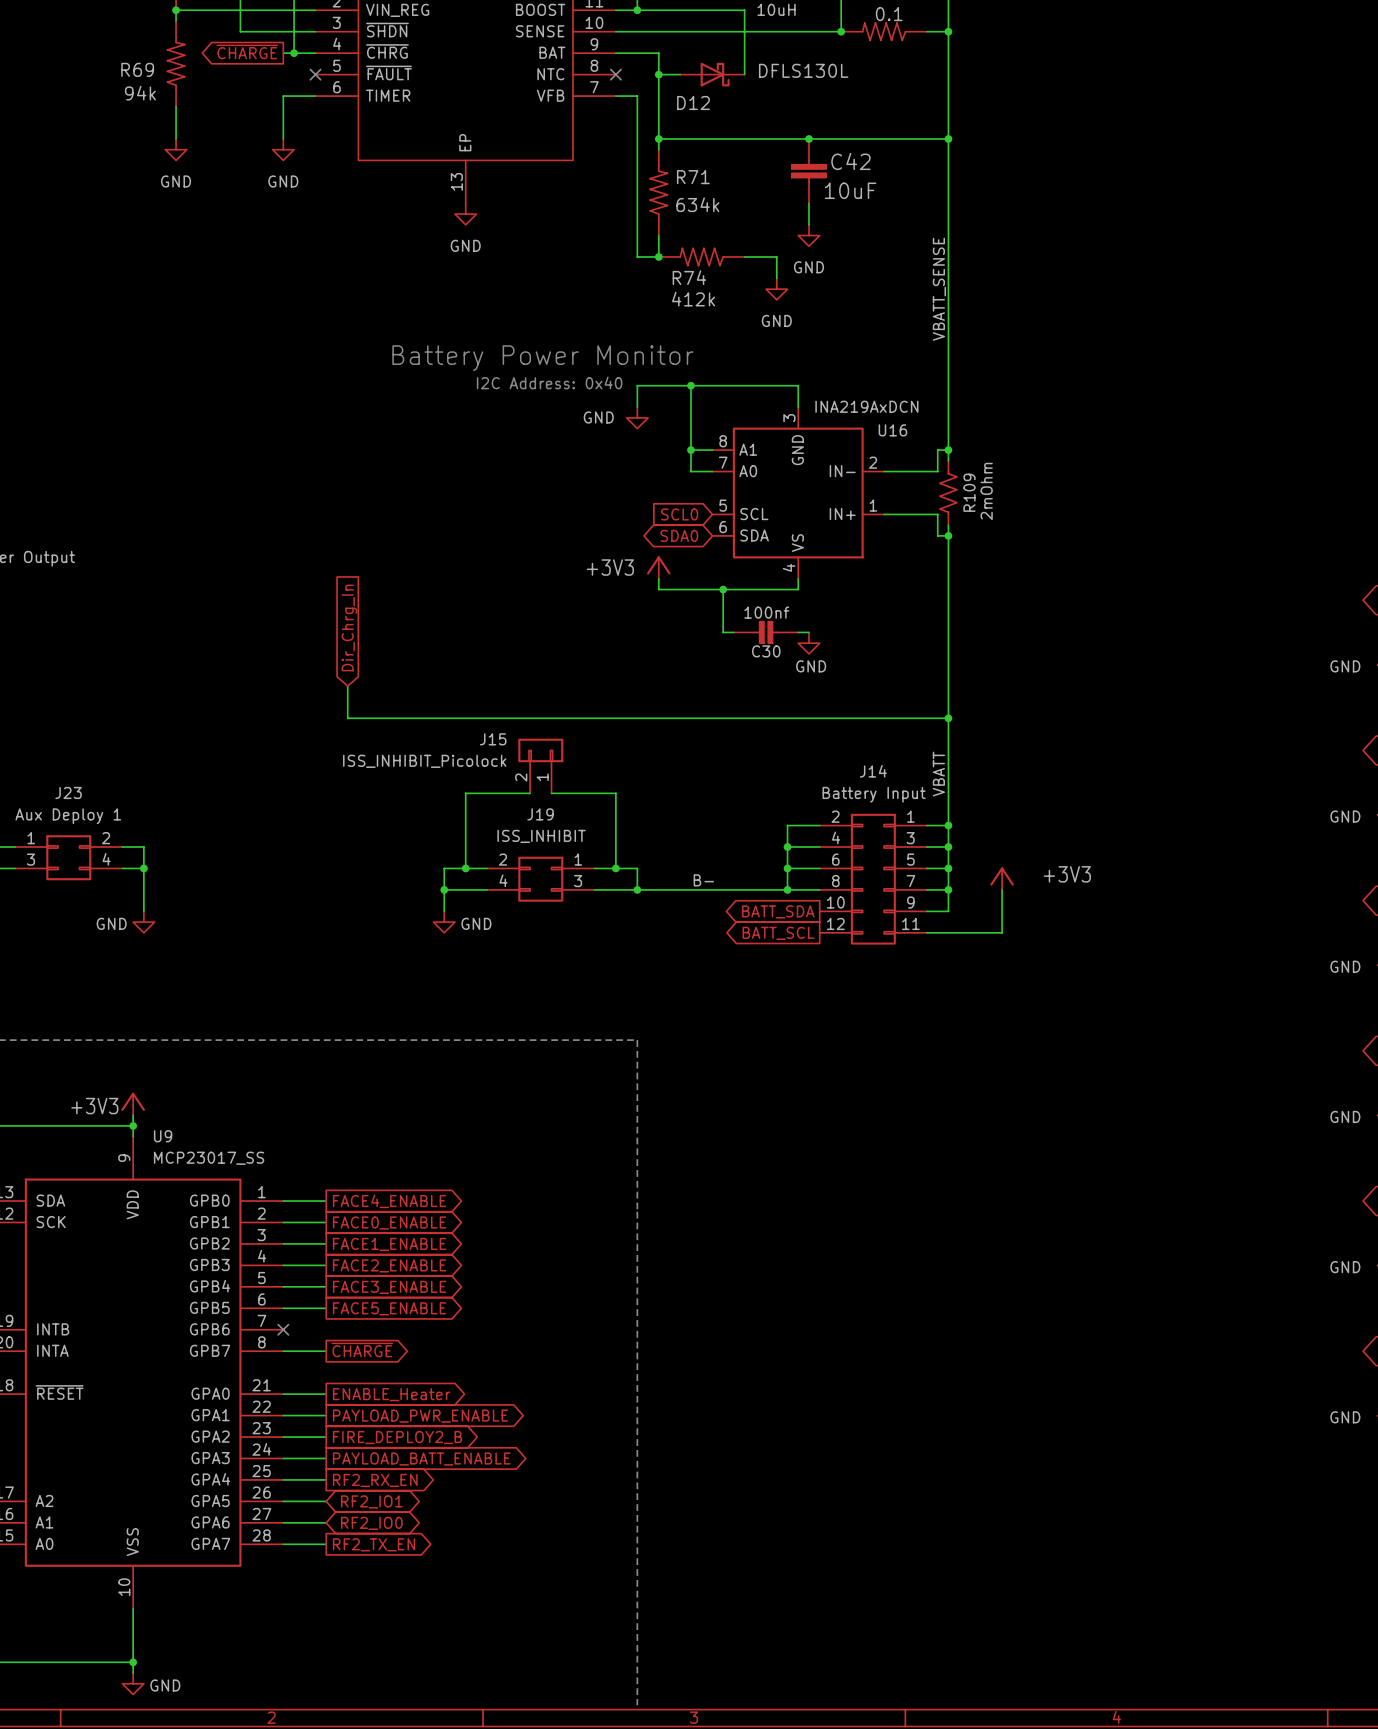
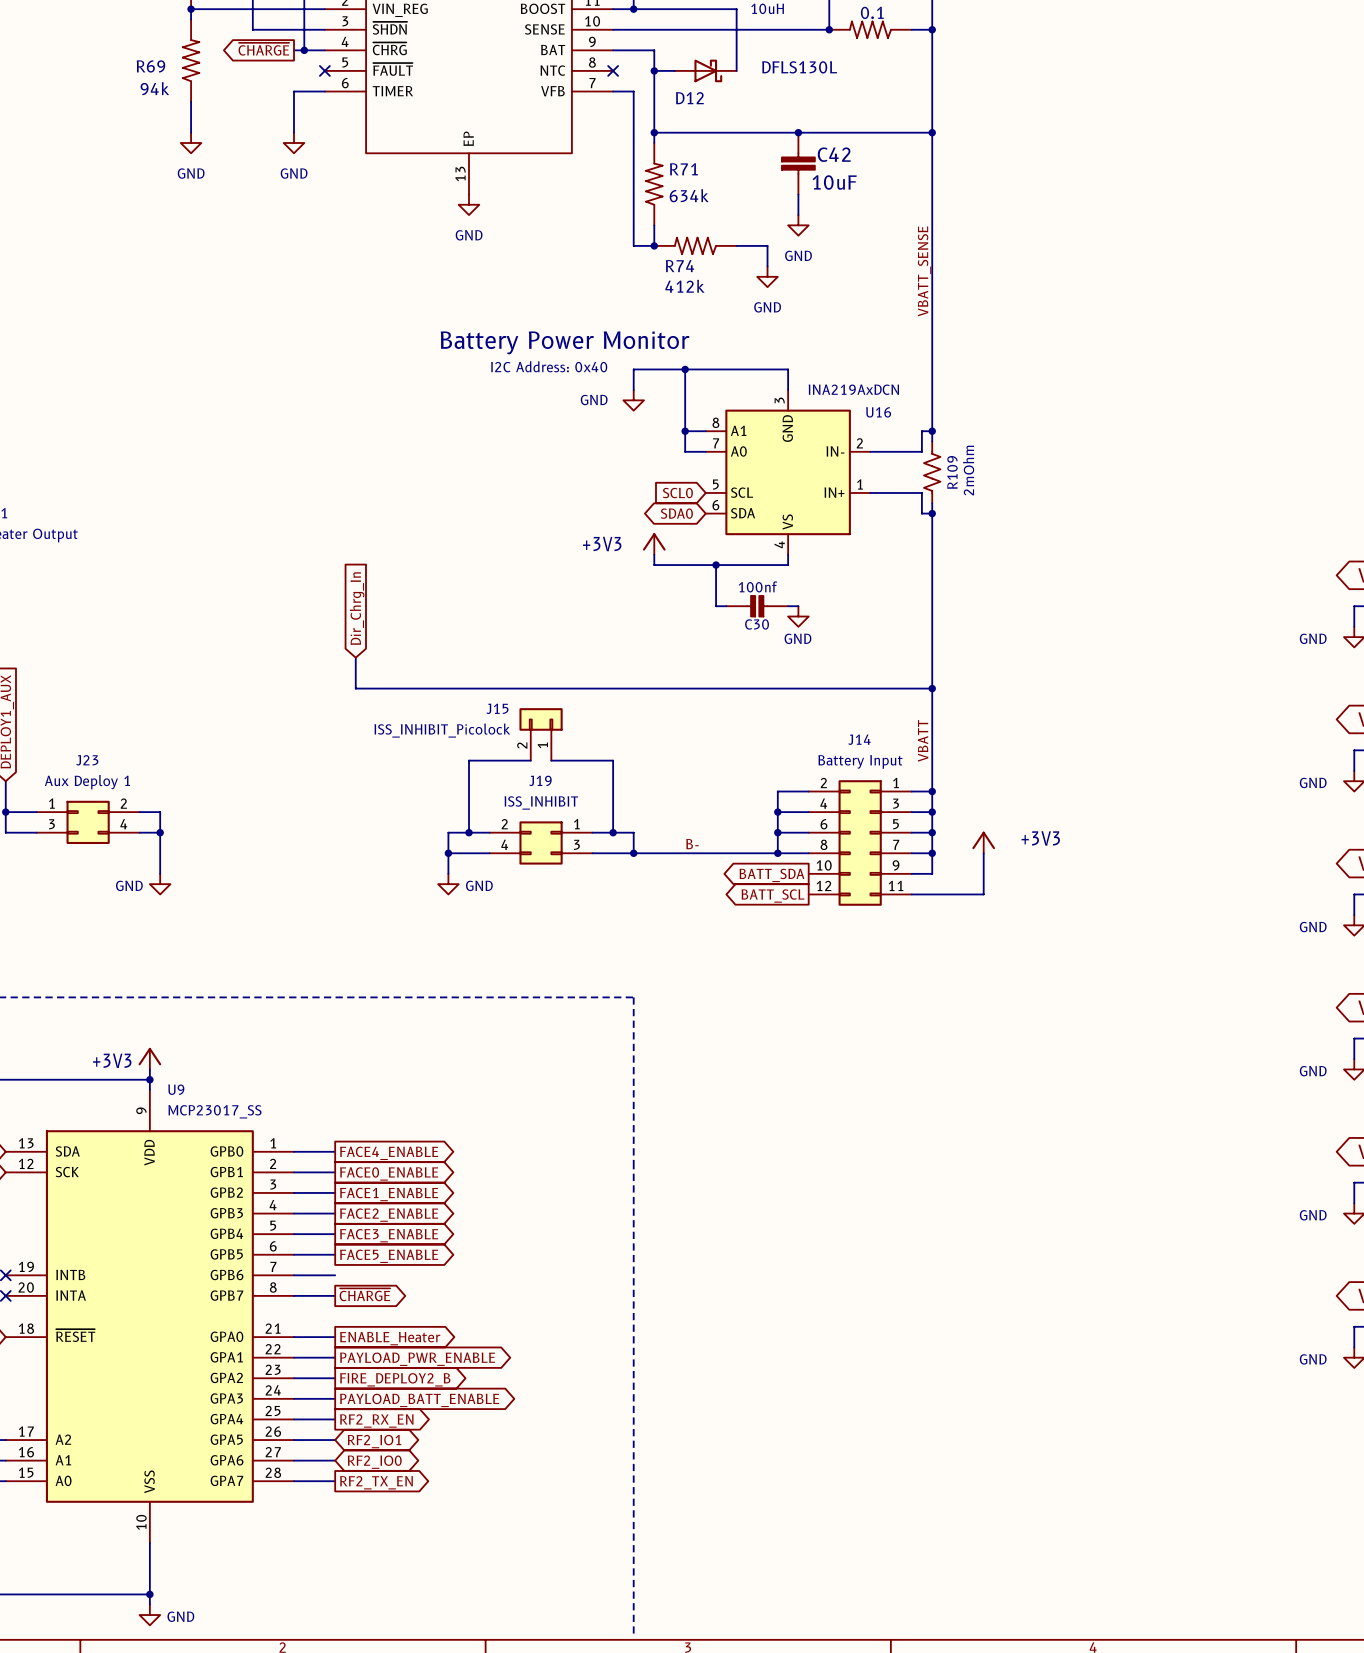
wire: none -> (294, 1275) (335, 1275)
no-connect mark: (283, 1329) -> none

